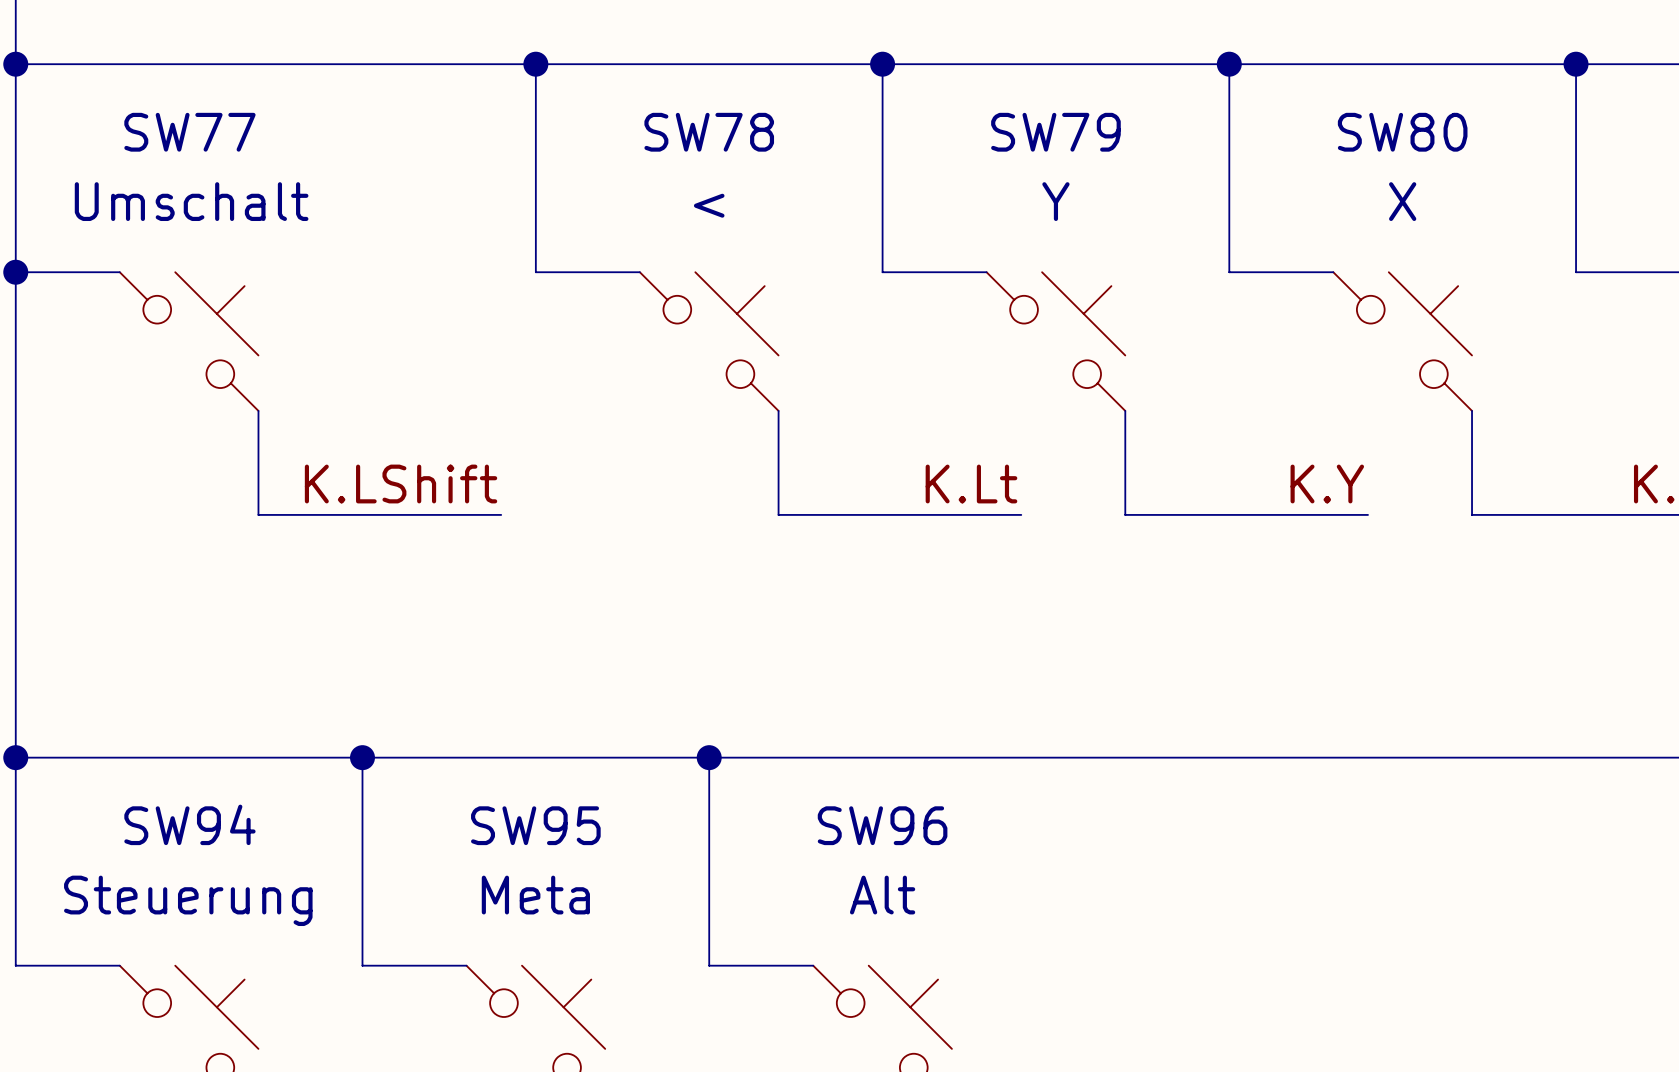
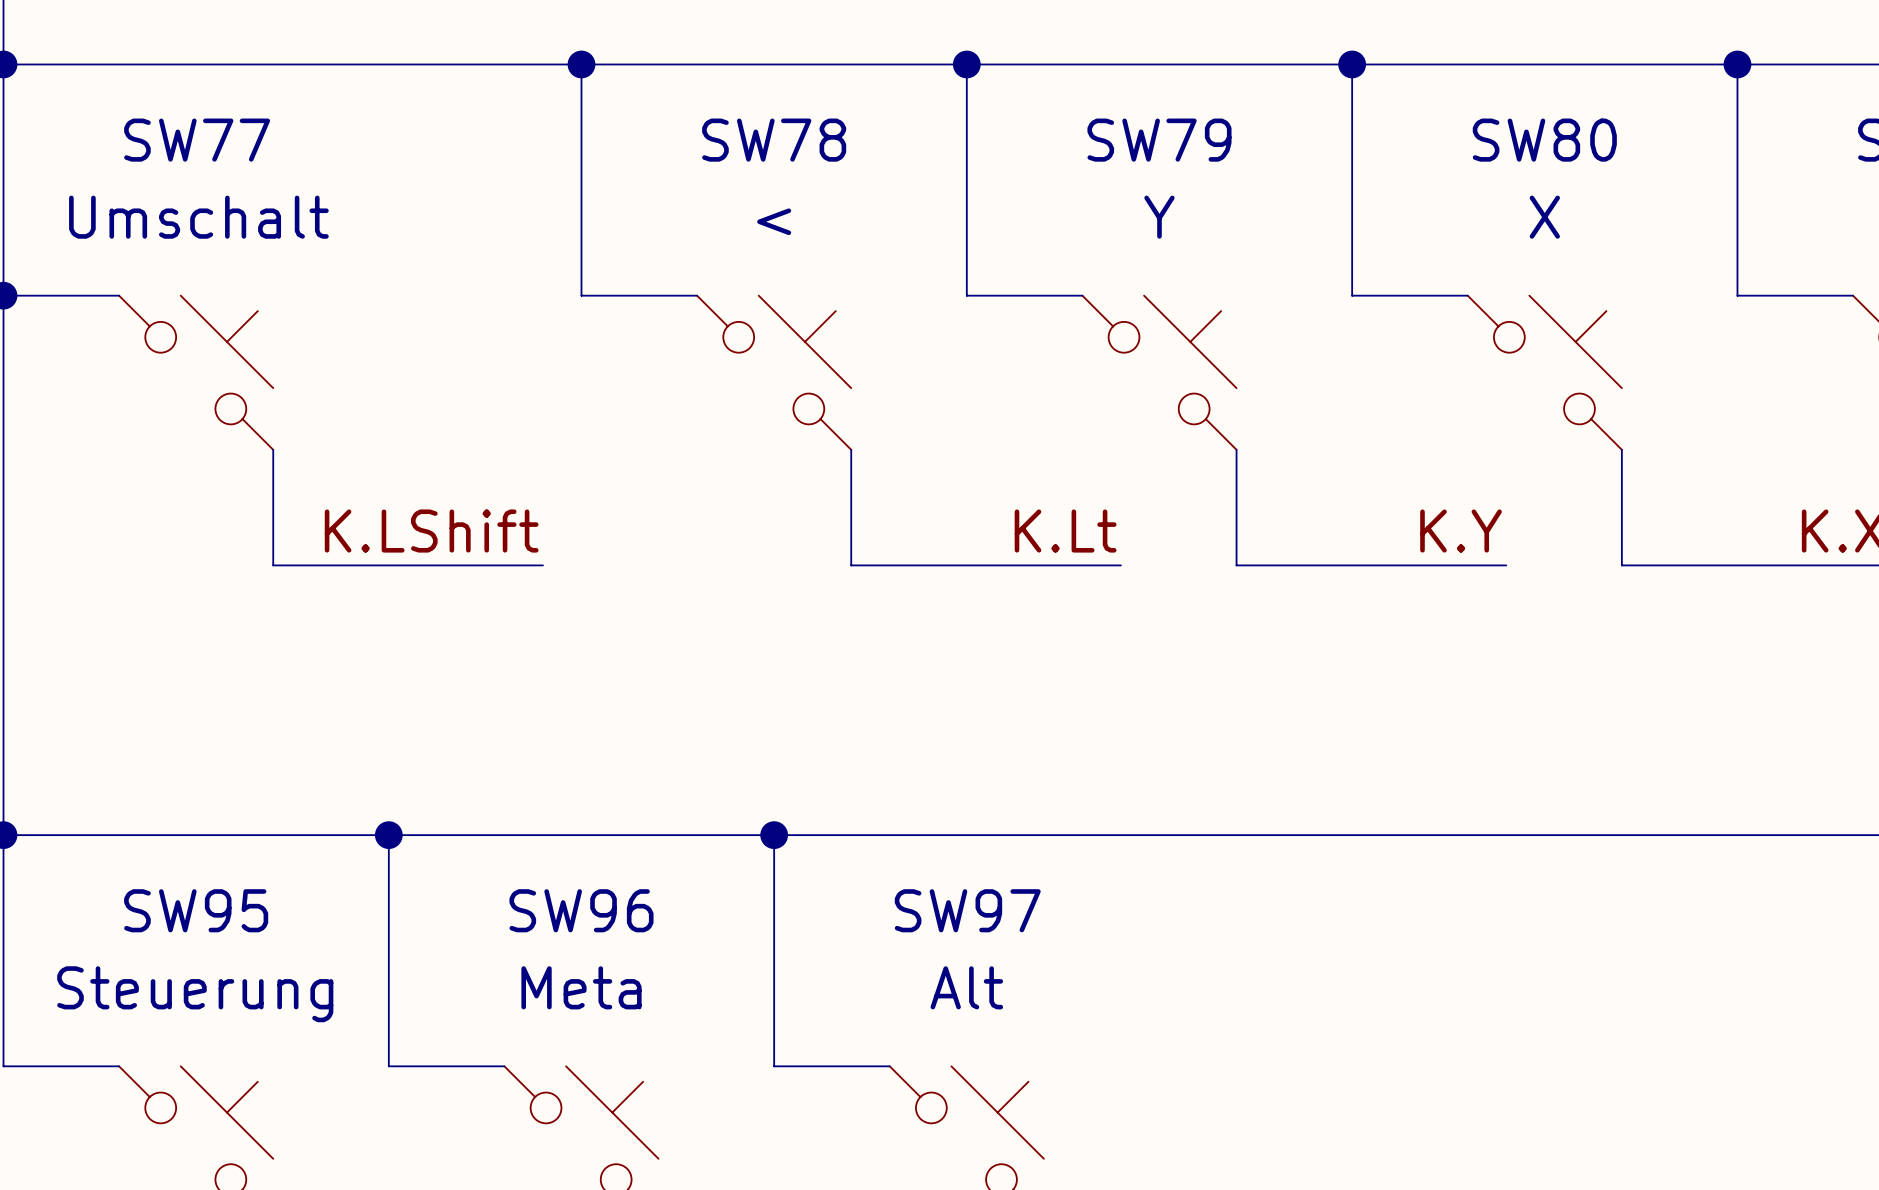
SW94 name: SW94 (189, 824) -> SW95 (196, 910)
SW95 name: SW95 (535, 825) -> SW96 (581, 910)
SW96 name: SW96 (882, 825) -> SW97 (967, 910)

